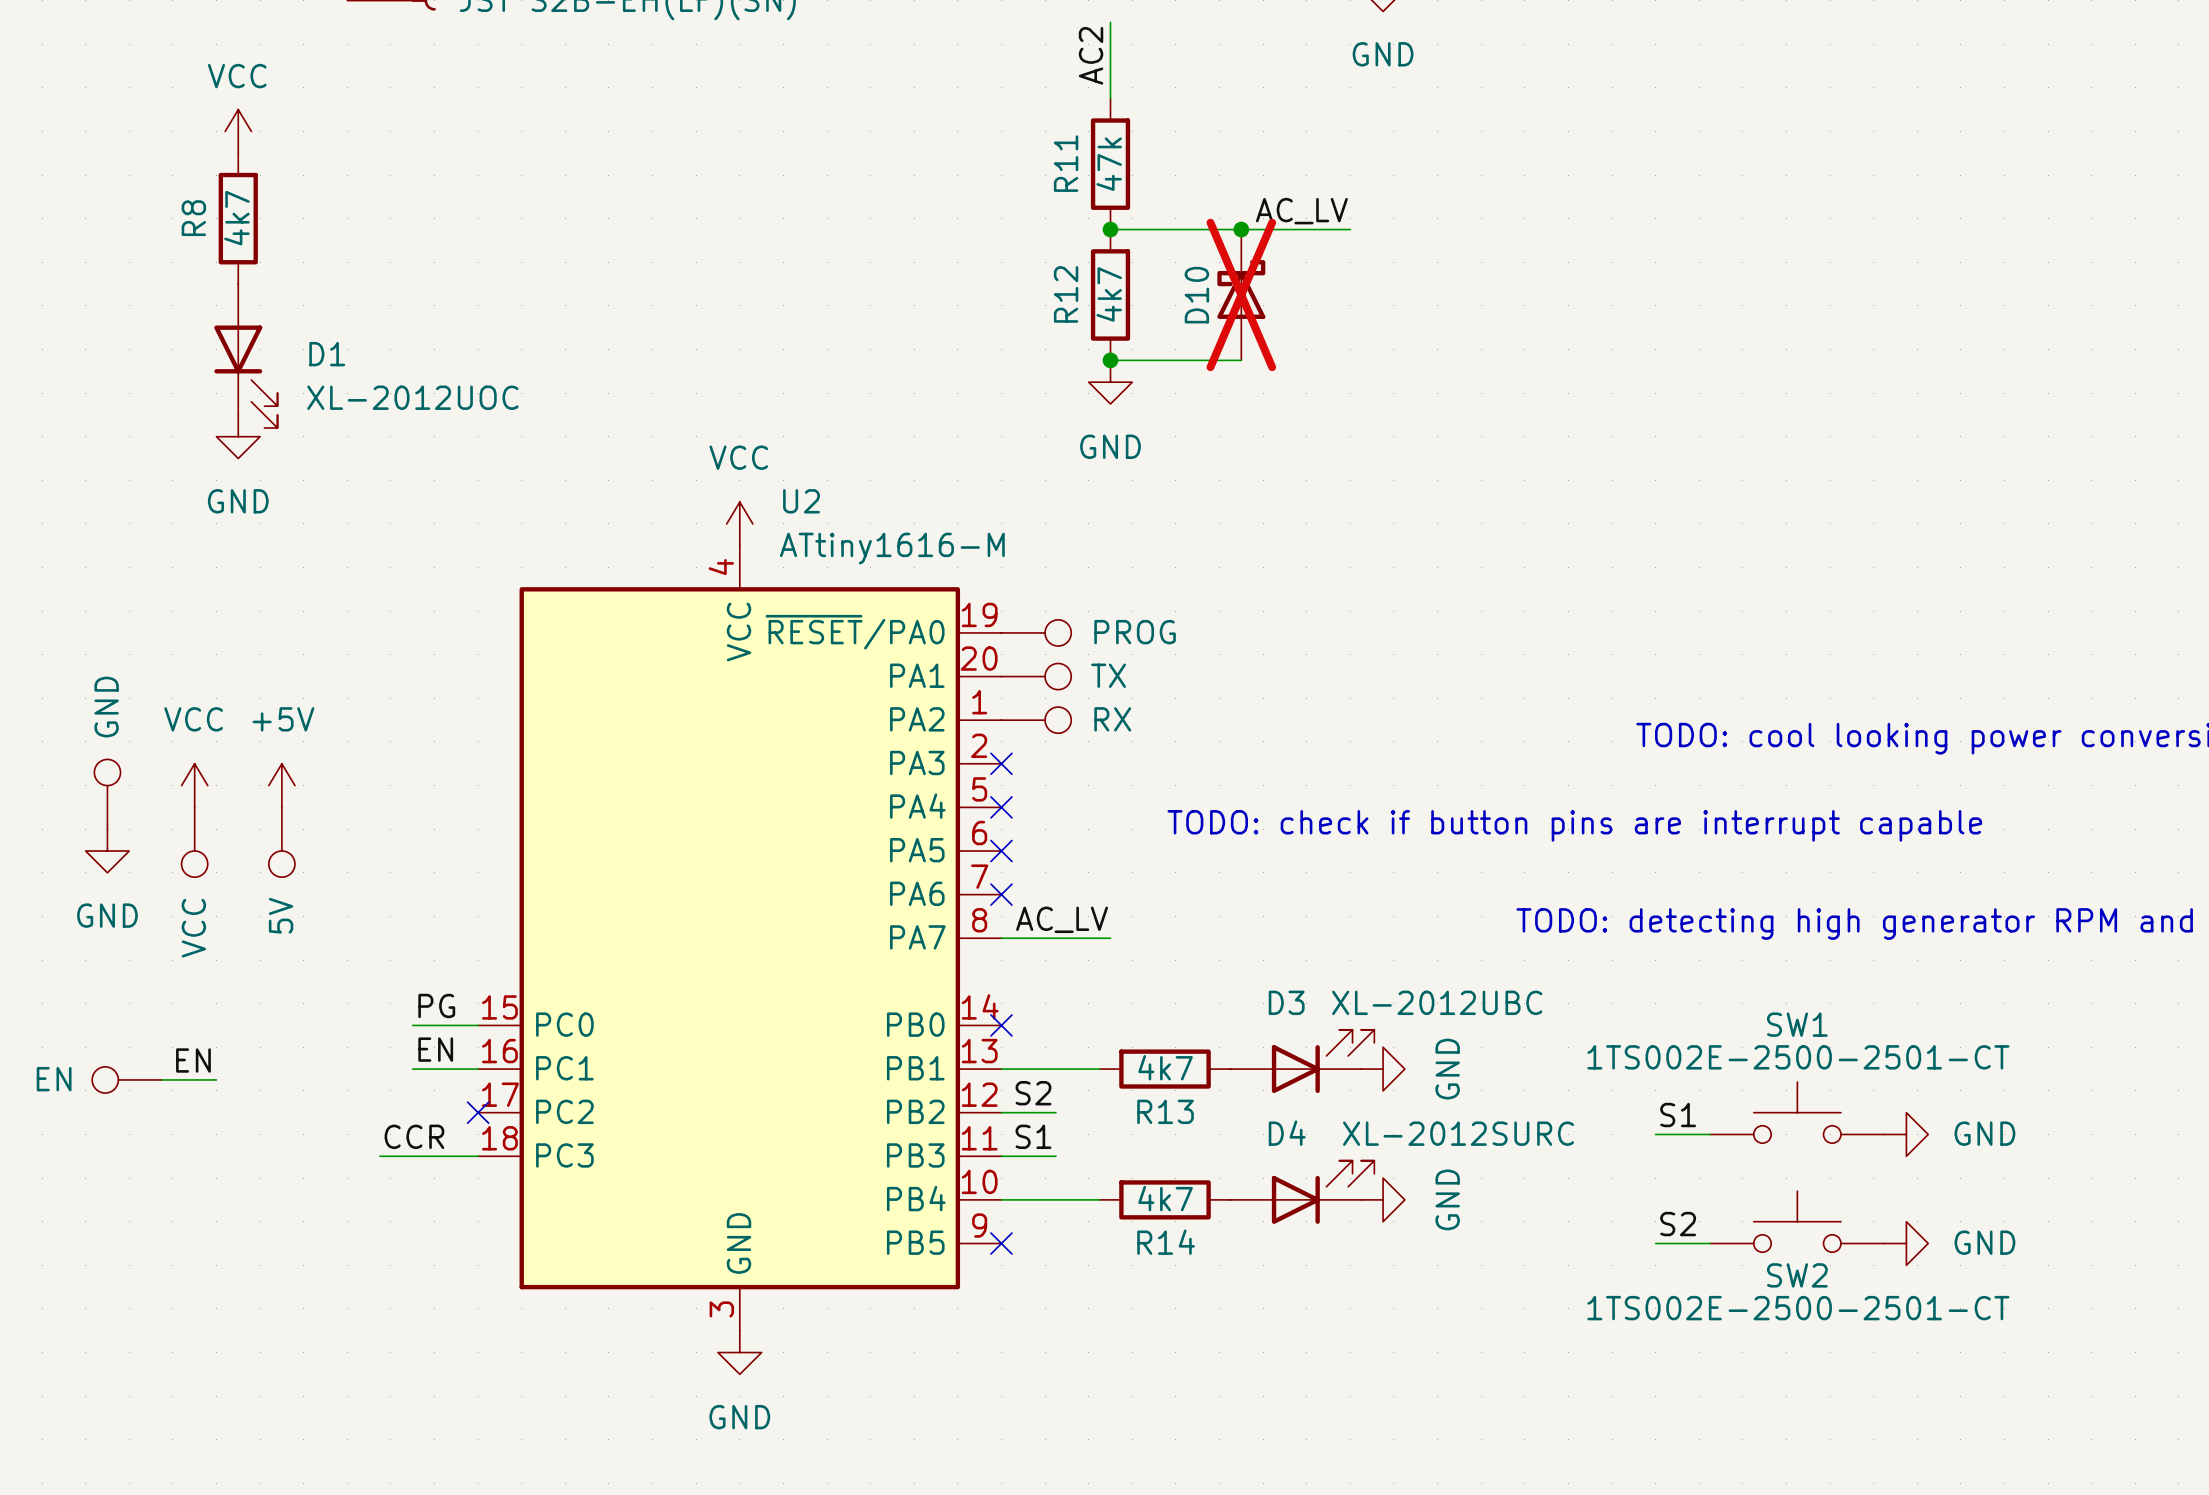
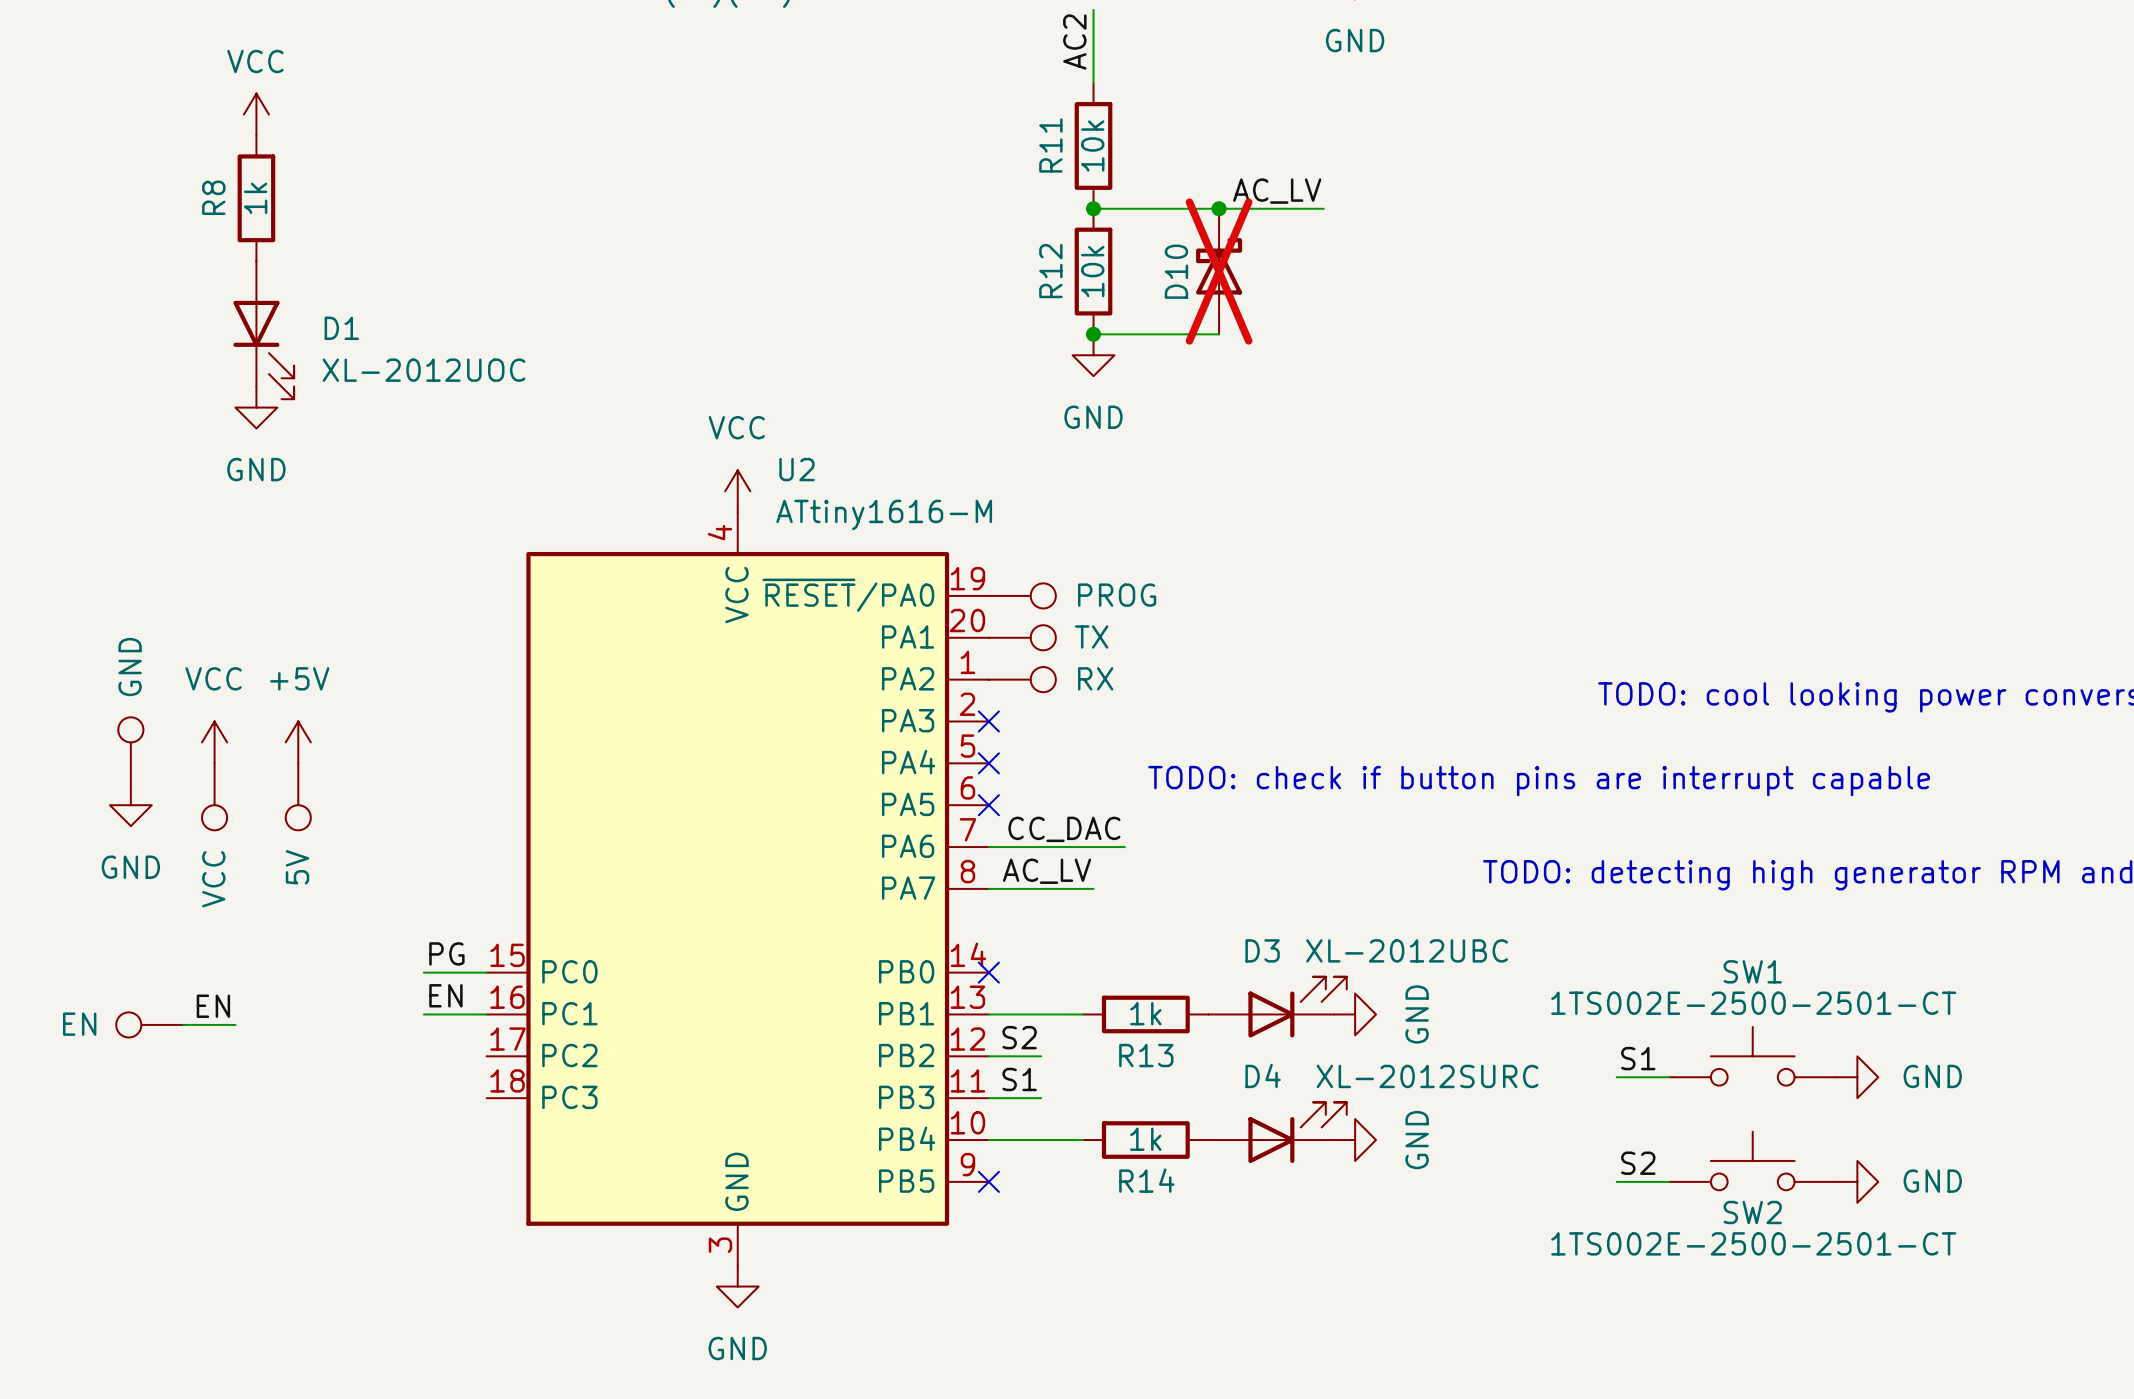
R11 value: 47k (1109, 164) -> 10k (1092, 145)
R8 value: 4k7 (236, 218) -> 1k (255, 198)
R12 value: 4k7 (1109, 294) -> 10k (1092, 271)
label: none -> CC_DAC (1064, 829)
wire: none -> (988, 847) (1124, 847)
no-connect mark: (1001, 894) -> none
R13 value: 4k7 (1165, 1067) -> 1k (1145, 1013)
no-connect mark: (478, 1112) -> none
label: CCR (414, 1136) -> none
wire: (380, 1156) (478, 1156) -> none
R14 value: 4k7 (1165, 1198) -> 1k (1145, 1139)

